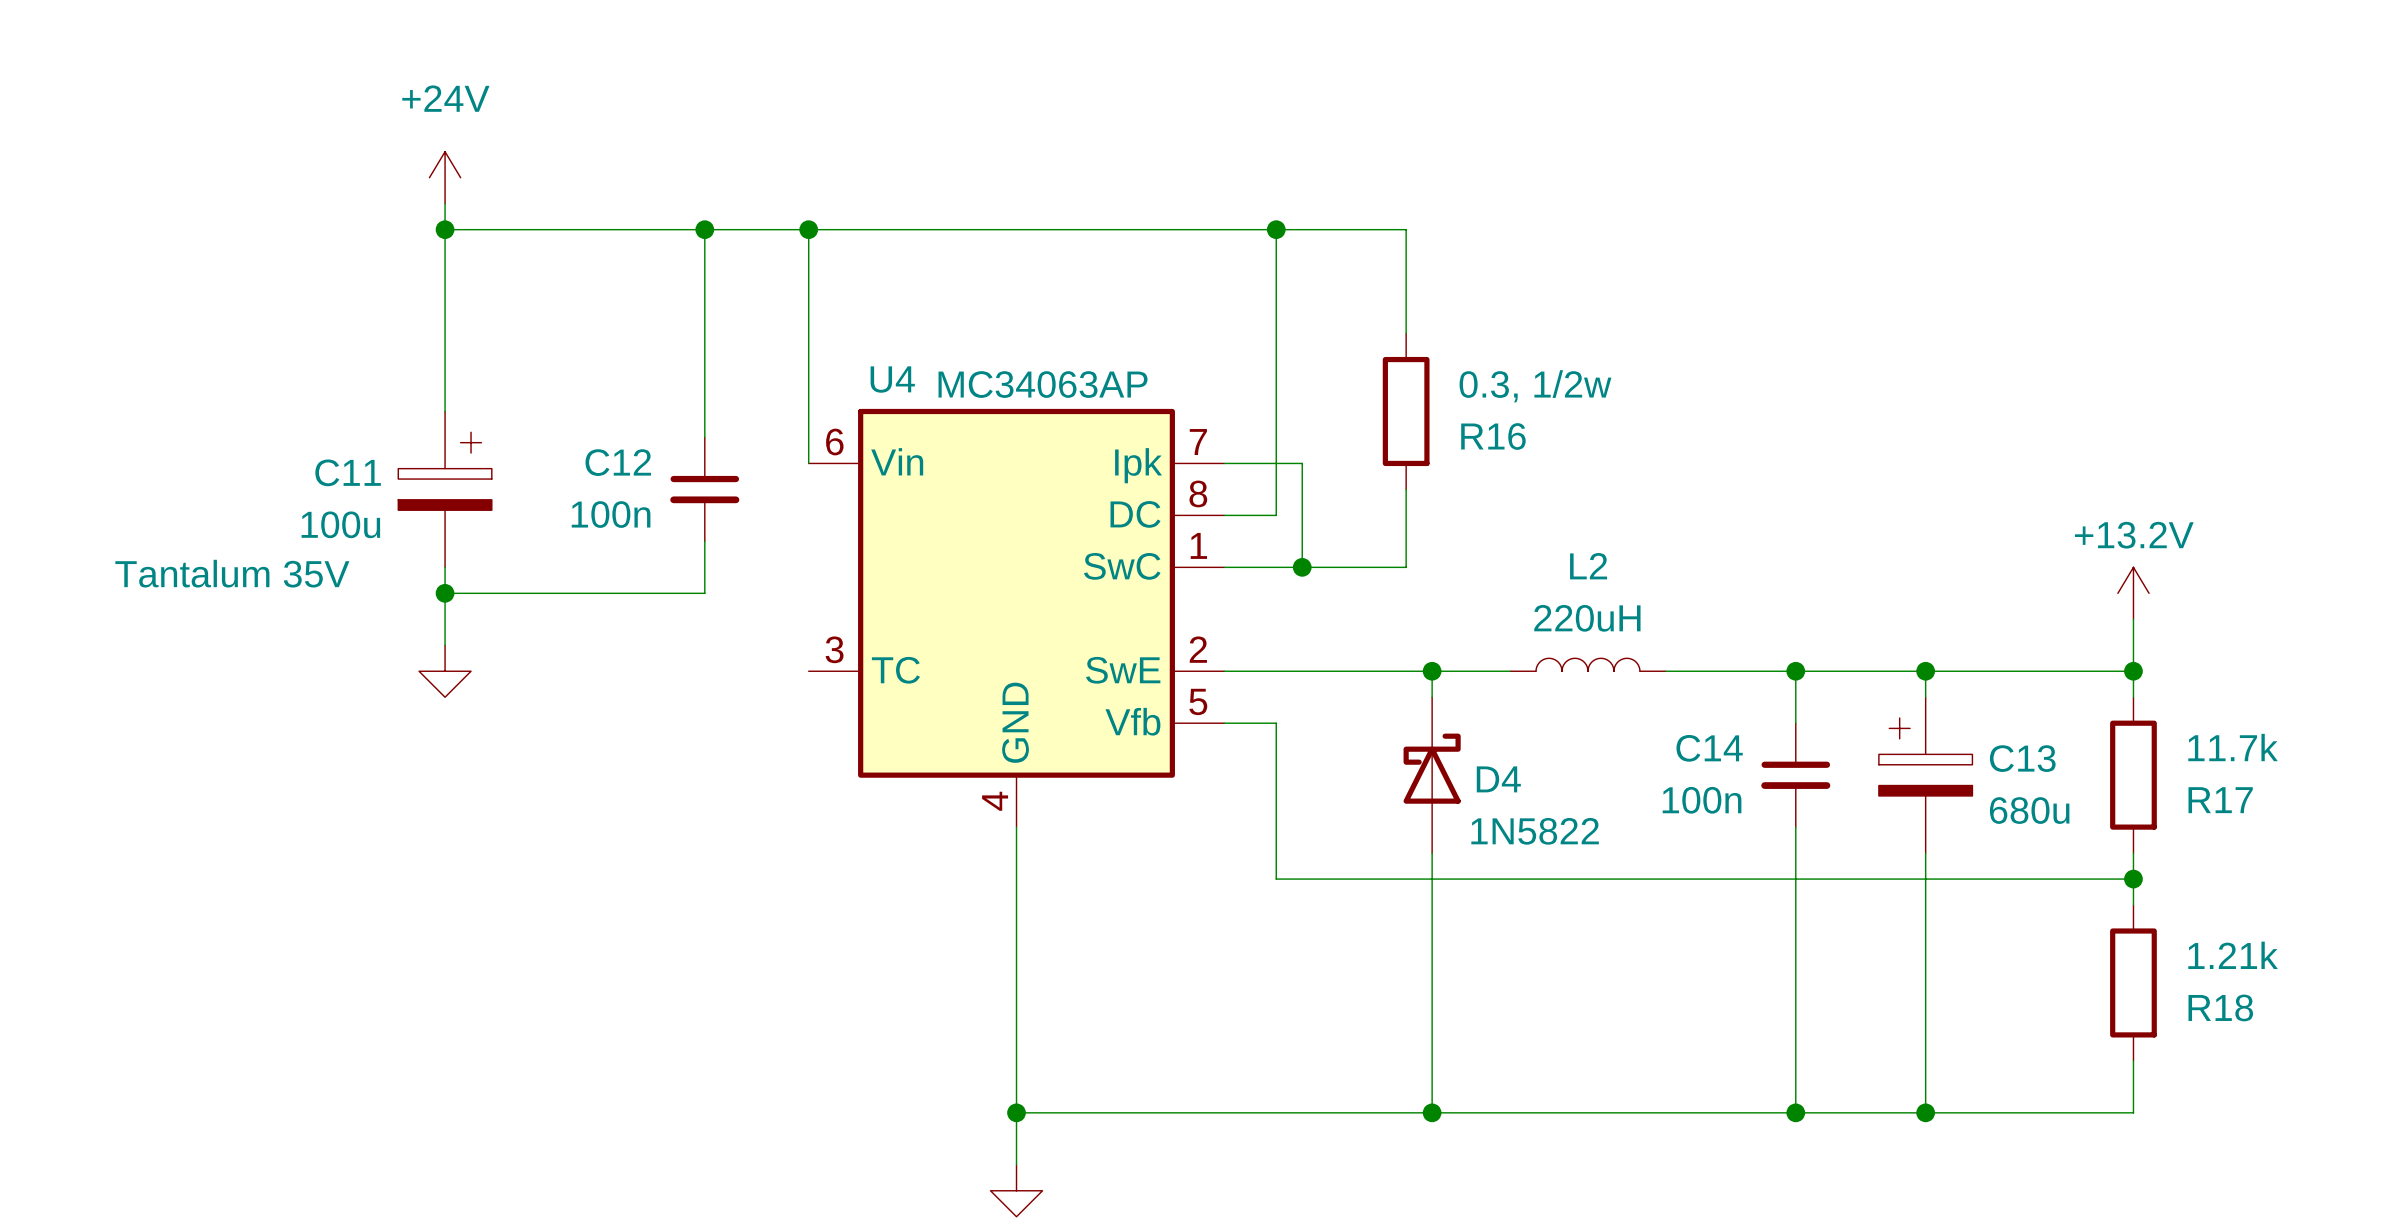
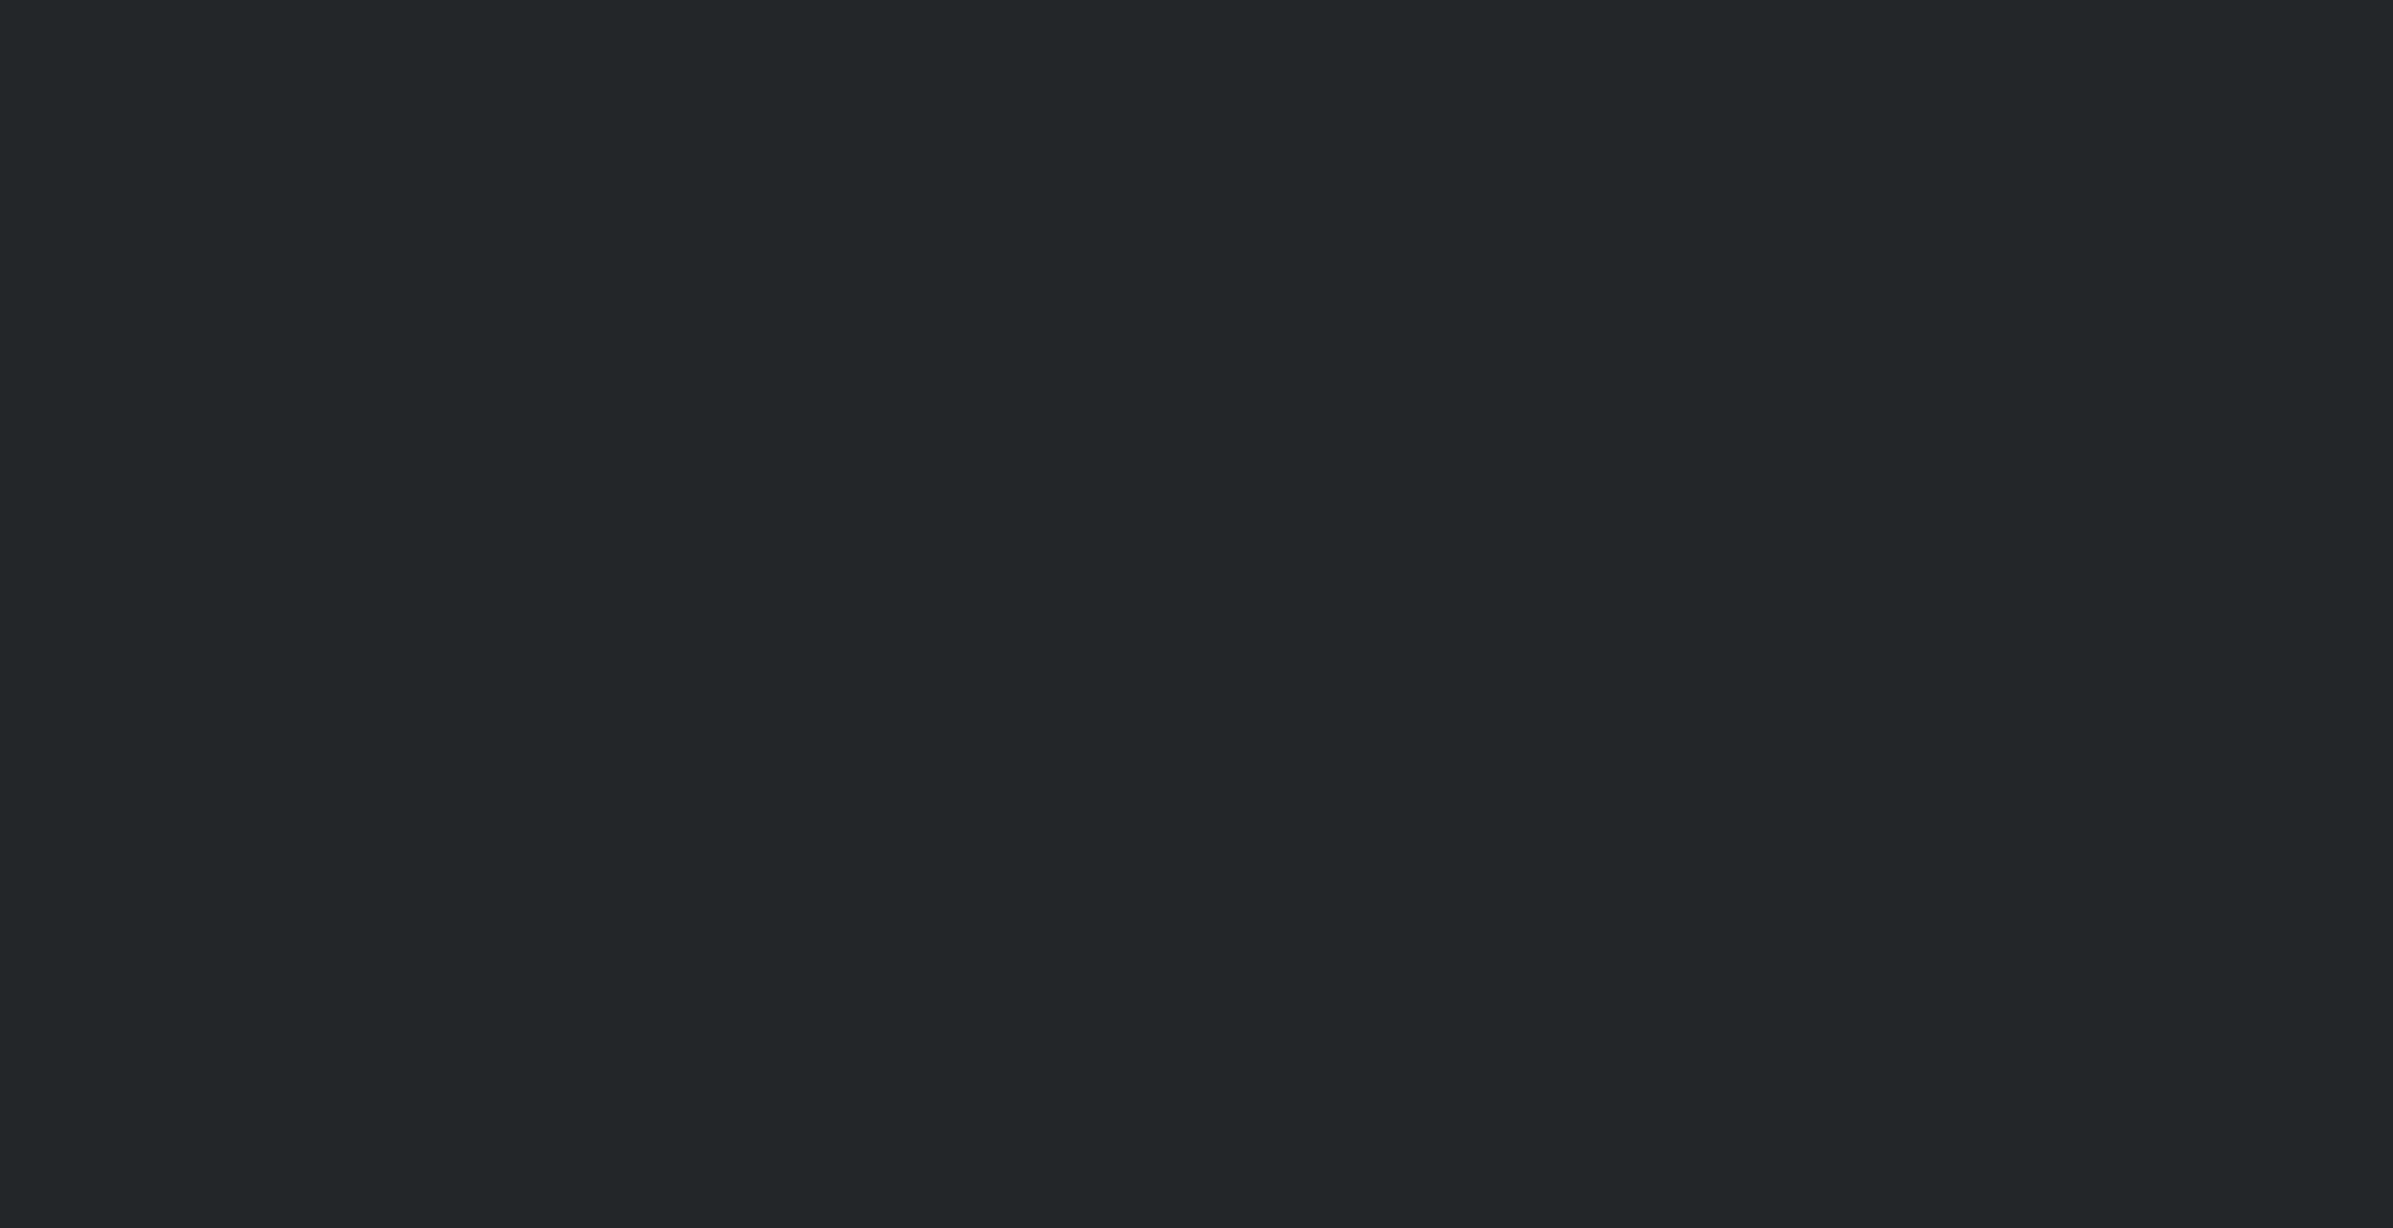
power symbol: +24V (445, 177) -> none
wire: (445, 203) (445, 411) -> none
wire: (445, 229) (1406, 229) (1406, 333) -> none
junction: (445, 229) -> none
wire: (704, 229) (704, 437) -> none
junction: (704, 229) -> none
wire: (808, 229) (808, 463) -> none
junction: (808, 229) -> none
wire: (1276, 229) (1276, 515) (1224, 515) -> none
junction: (1276, 229) -> none
R16: 0.3, 1/2w (1406, 411) -> none
wire: (1224, 463) (1302, 463) (1302, 567) -> none
C11: 100u (445, 489) -> none
C12: 100n (704, 489) -> none
wire: (1406, 489) (1406, 567) (1224, 567) -> none
wire: (704, 541) (704, 593) (445, 593) -> none
wire: (445, 567) (445, 645) -> none
junction: (1302, 567) -> none
junction: (445, 593) -> none
power symbol: +13.2V (2133, 593) -> none
U4: MC34063AP (1016, 618) -> none
wire: (2133, 619) (2133, 697) -> none
L2: 220uH (1587, 664) -> none
power symbol: (445, 671) -> none
wire: (1224, 671) (1510, 671) -> none
wire: (1432, 671) (1432, 697) -> none
junction: (1432, 671) -> none
wire: (1665, 671) (2133, 671) -> none
wire: (1795, 671) (1795, 723) -> none
junction: (1795, 671) -> none
wire: (1925, 671) (1925, 697) -> none
junction: (1925, 671) -> none
junction: (2133, 671) -> none
wire: (1224, 723) (1276, 723) (1276, 879) (2133, 879) -> none
D4: 1N5822 (1432, 775) -> none
C14: 100n (1795, 775) -> none
C13: 680u (1925, 775) -> none
R17: 11.7k (2133, 775) -> none
wire: (1016, 827) (1016, 1164) -> none
wire: (1795, 827) (1795, 1112) -> none
wire: (1432, 853) (1432, 1112) -> none
wire: (1925, 853) (1925, 1112) -> none
wire: (2133, 853) (2133, 905) -> none
junction: (2133, 879) -> none
R18: 1.21k (2133, 982) -> none
wire: (2133, 1060) (2133, 1112) (1016, 1112) -> none
junction: (1016, 1112) -> none
junction: (1432, 1112) -> none
junction: (1795, 1112) -> none
junction: (1925, 1112) -> none
power symbol: (1016, 1190) -> none

